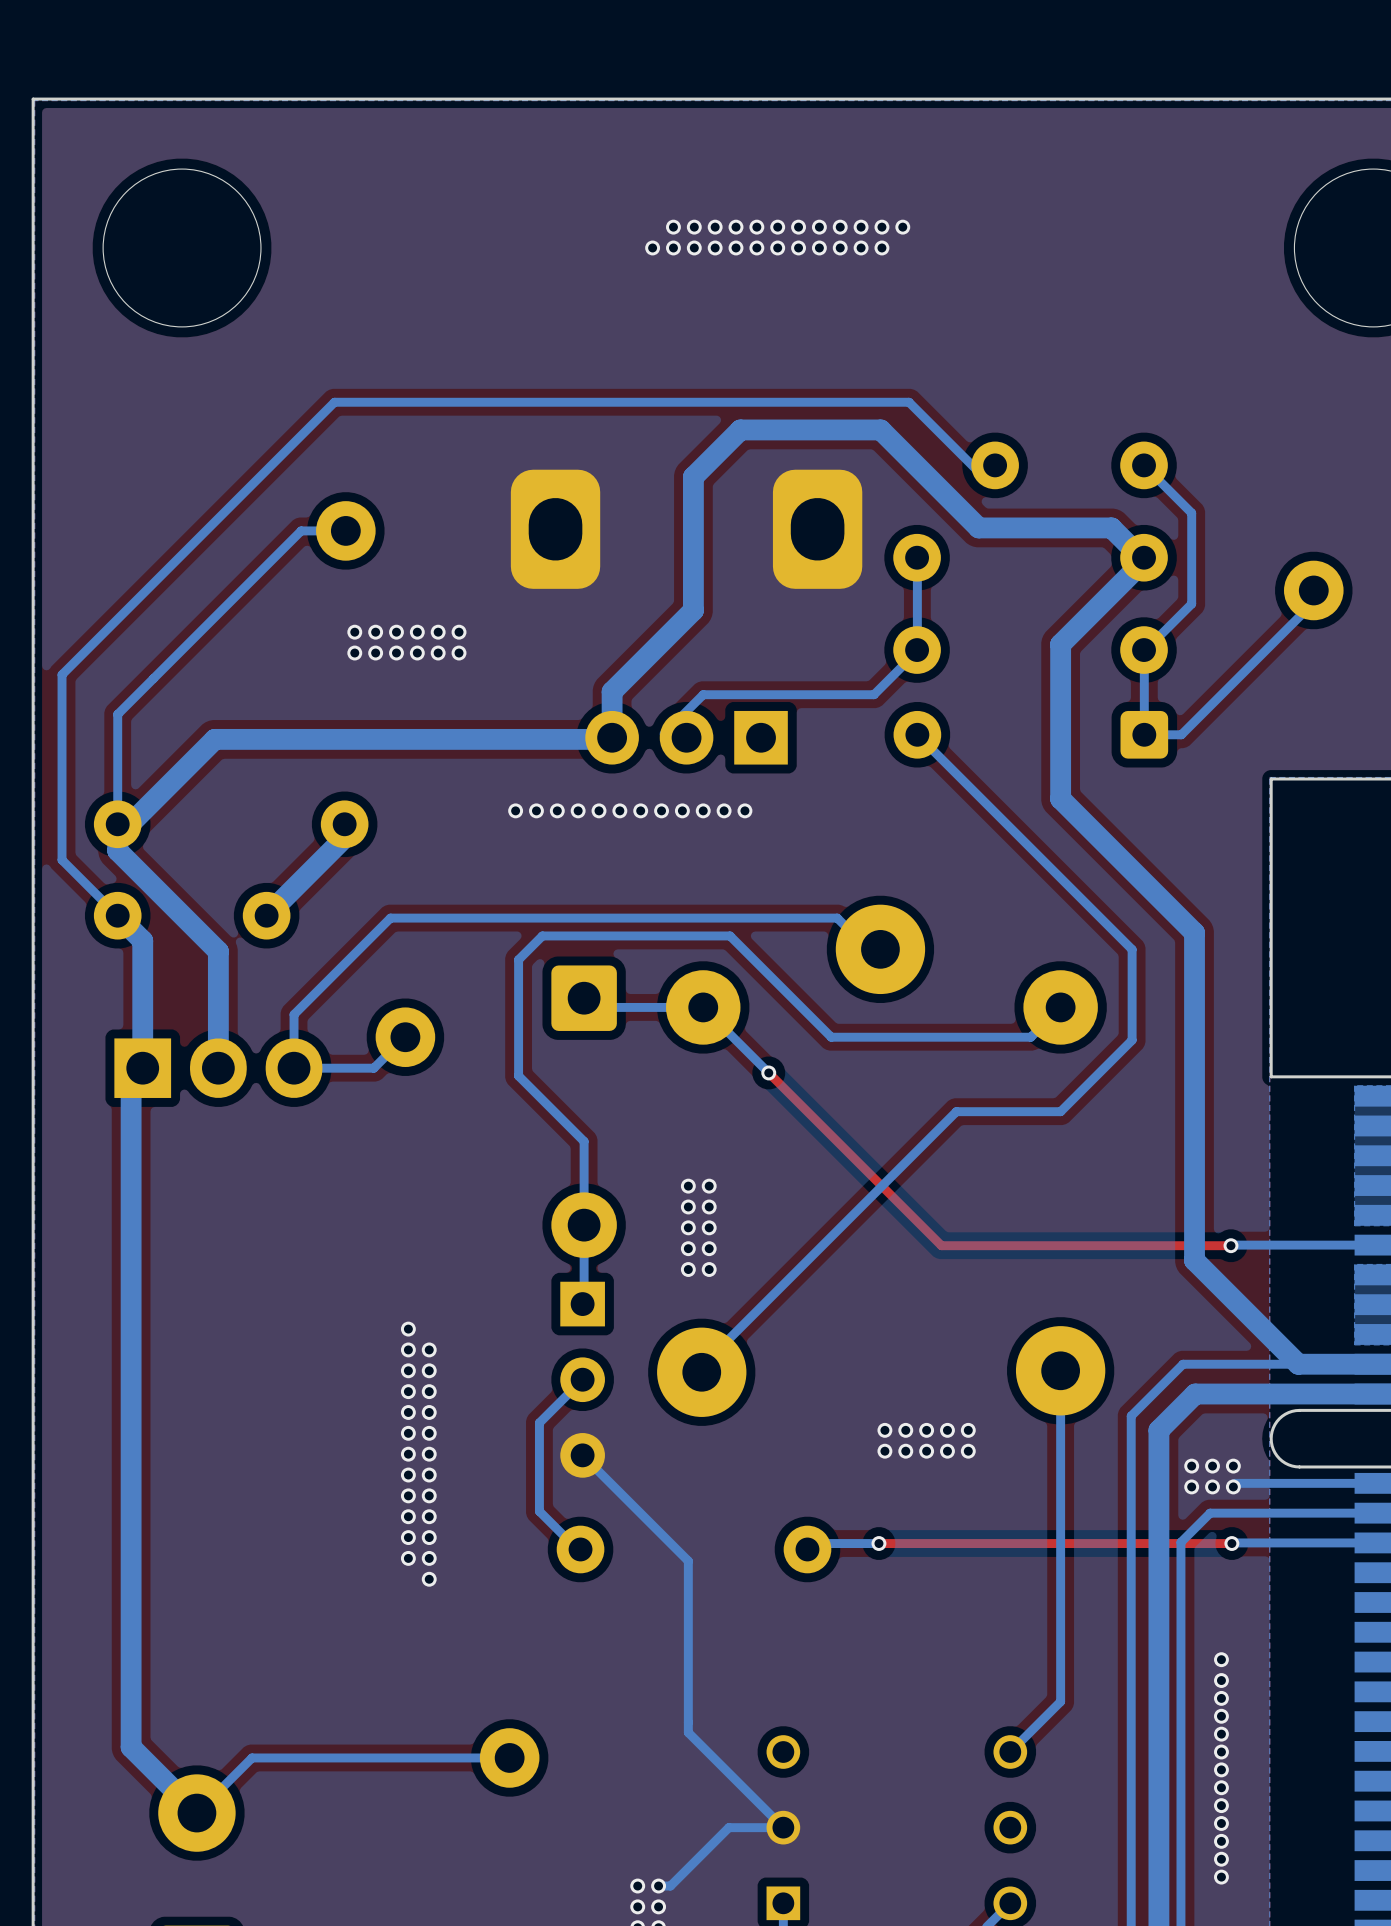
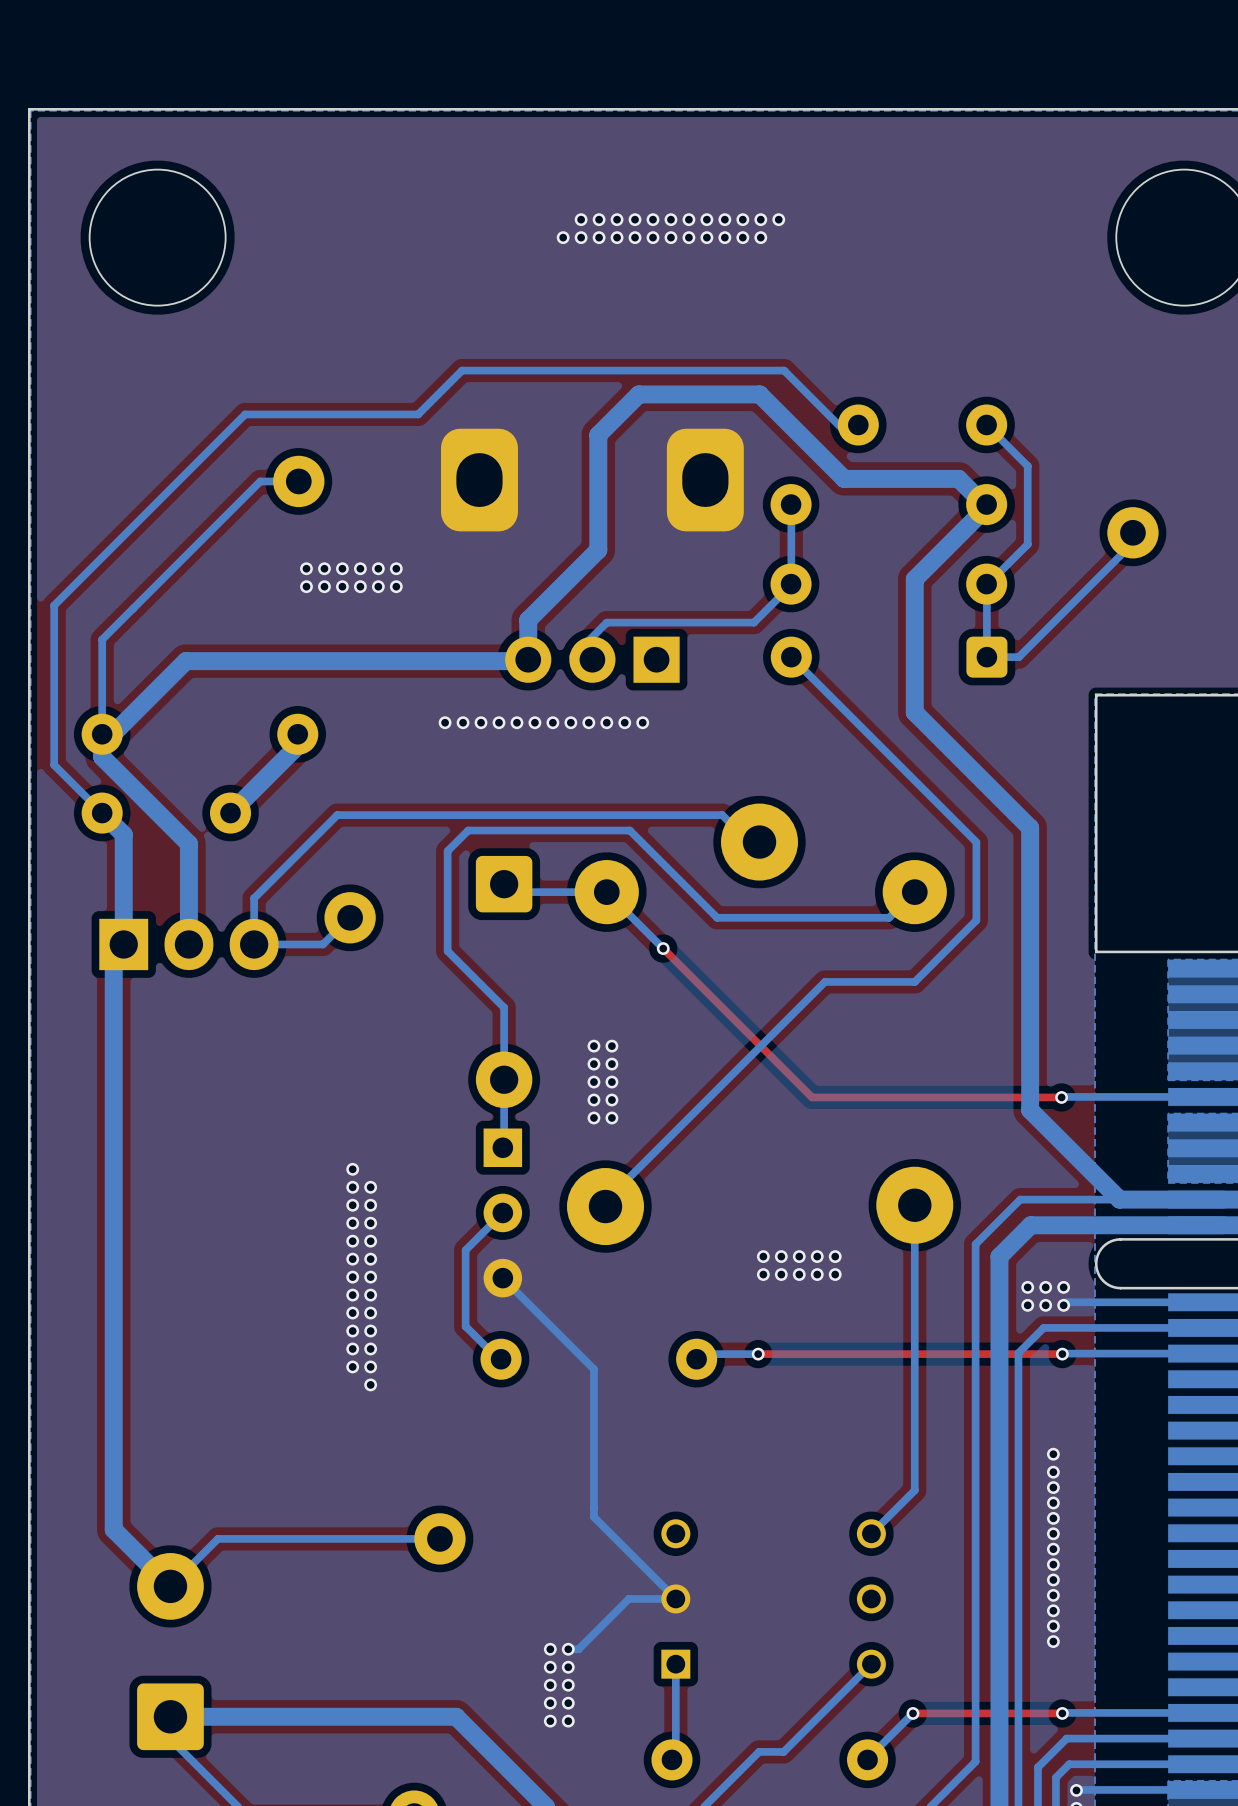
bottom track: (535, 402) (334, 402) (283, 453) -> (462, 370) (418, 414) (245, 414)

